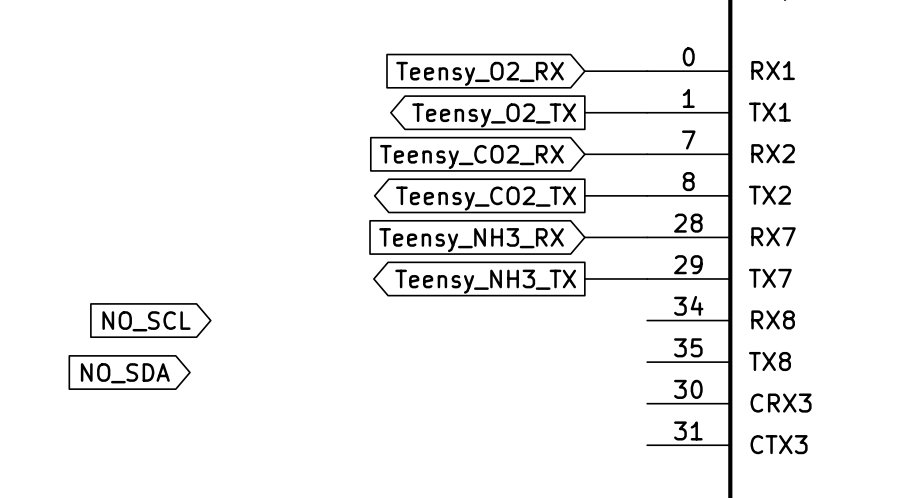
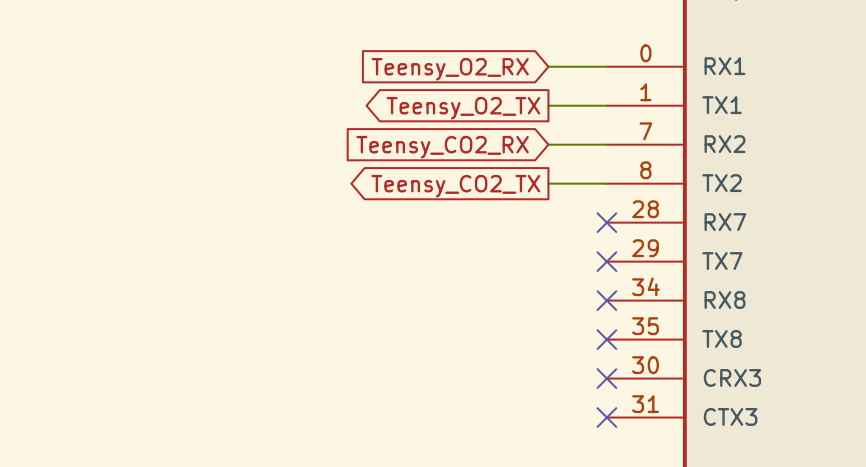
wire: (584, 237) (647, 237) -> none
no-connect mark: none -> (606, 222)
global label: Teensy_NH3_RX (471, 240) -> none
wire: (584, 278) (647, 278) -> none
no-connect mark: none -> (606, 261)
global label: Teensy_NH3_TX (485, 281) -> none
no-connect mark: none -> (606, 300)
global label: NO_SCL (146, 321) -> none
no-connect mark: none -> (606, 339)
global label: NO_SDA (125, 373) -> none
no-connect mark: none -> (606, 378)
no-connect mark: none -> (606, 417)

